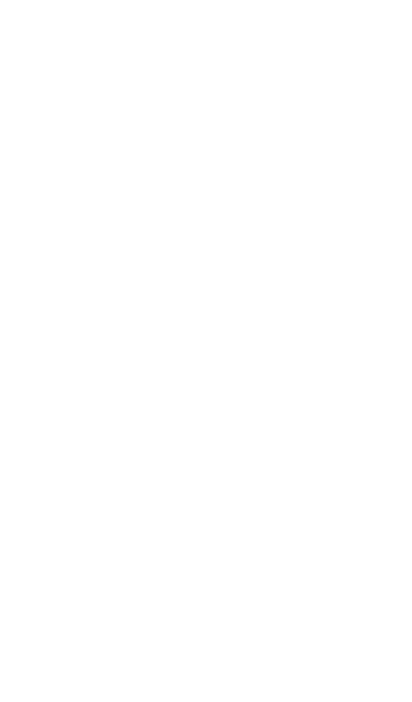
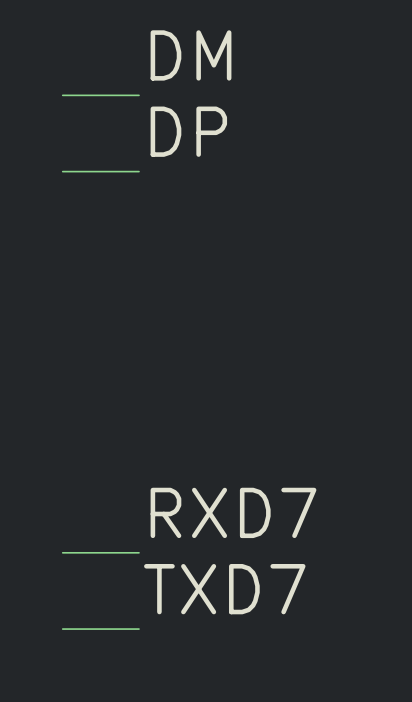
label: none -> DM (191, 55)
wire: none -> (62, 95) (138, 95)
label: none -> DP (188, 131)
wire: none -> (62, 171) (138, 171)
label: none -> RXD7 (233, 512)
wire: none -> (62, 552) (138, 552)
label: none -> TXD7 (224, 589)
wire: none -> (62, 629) (138, 629)

